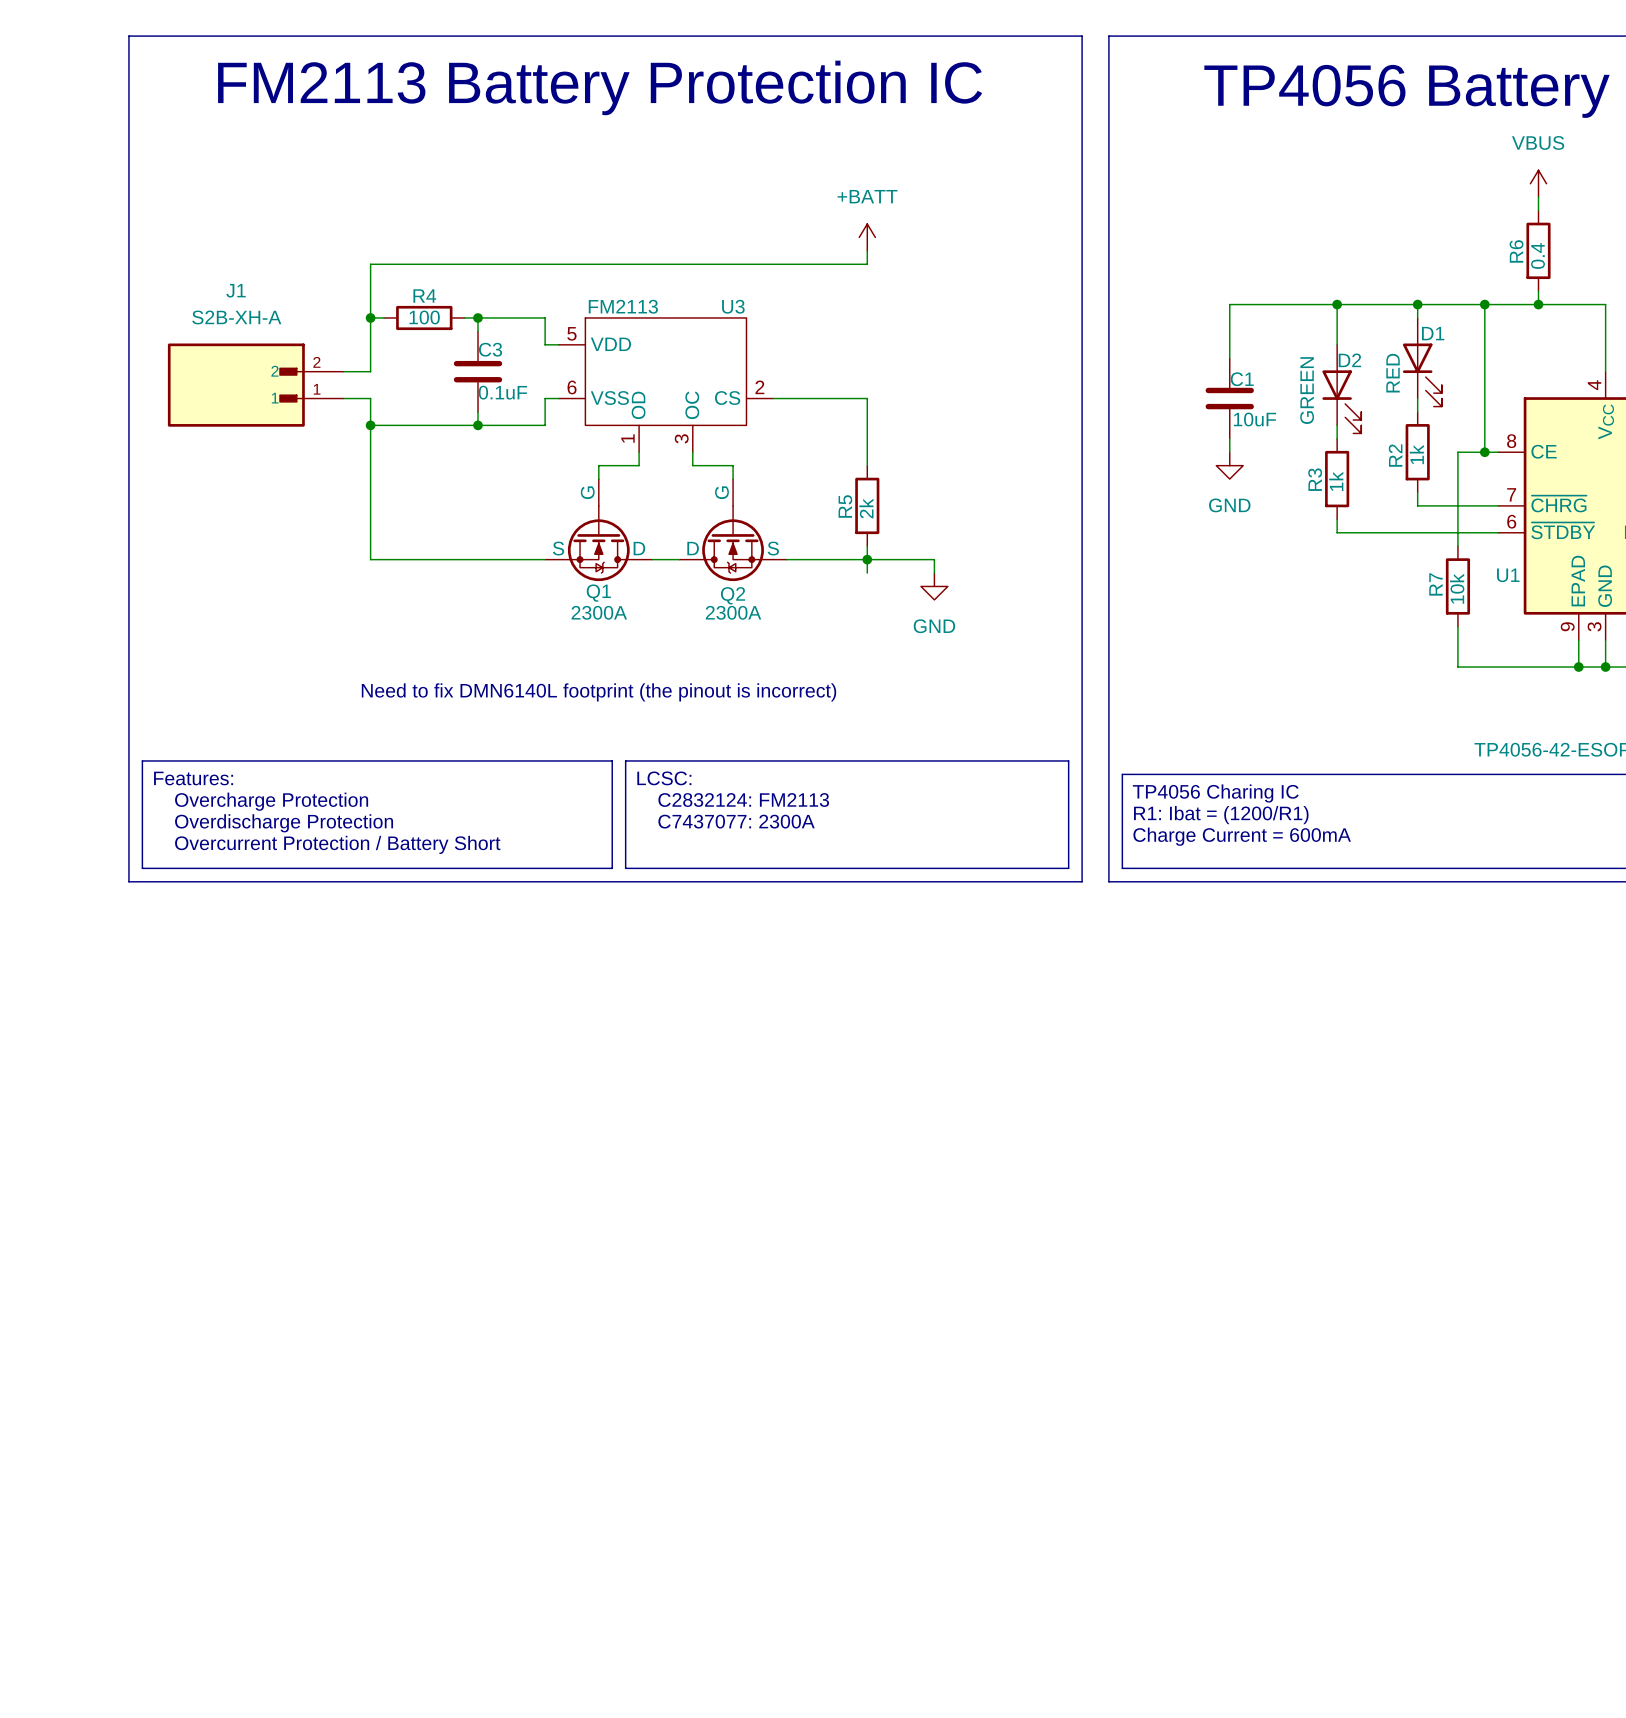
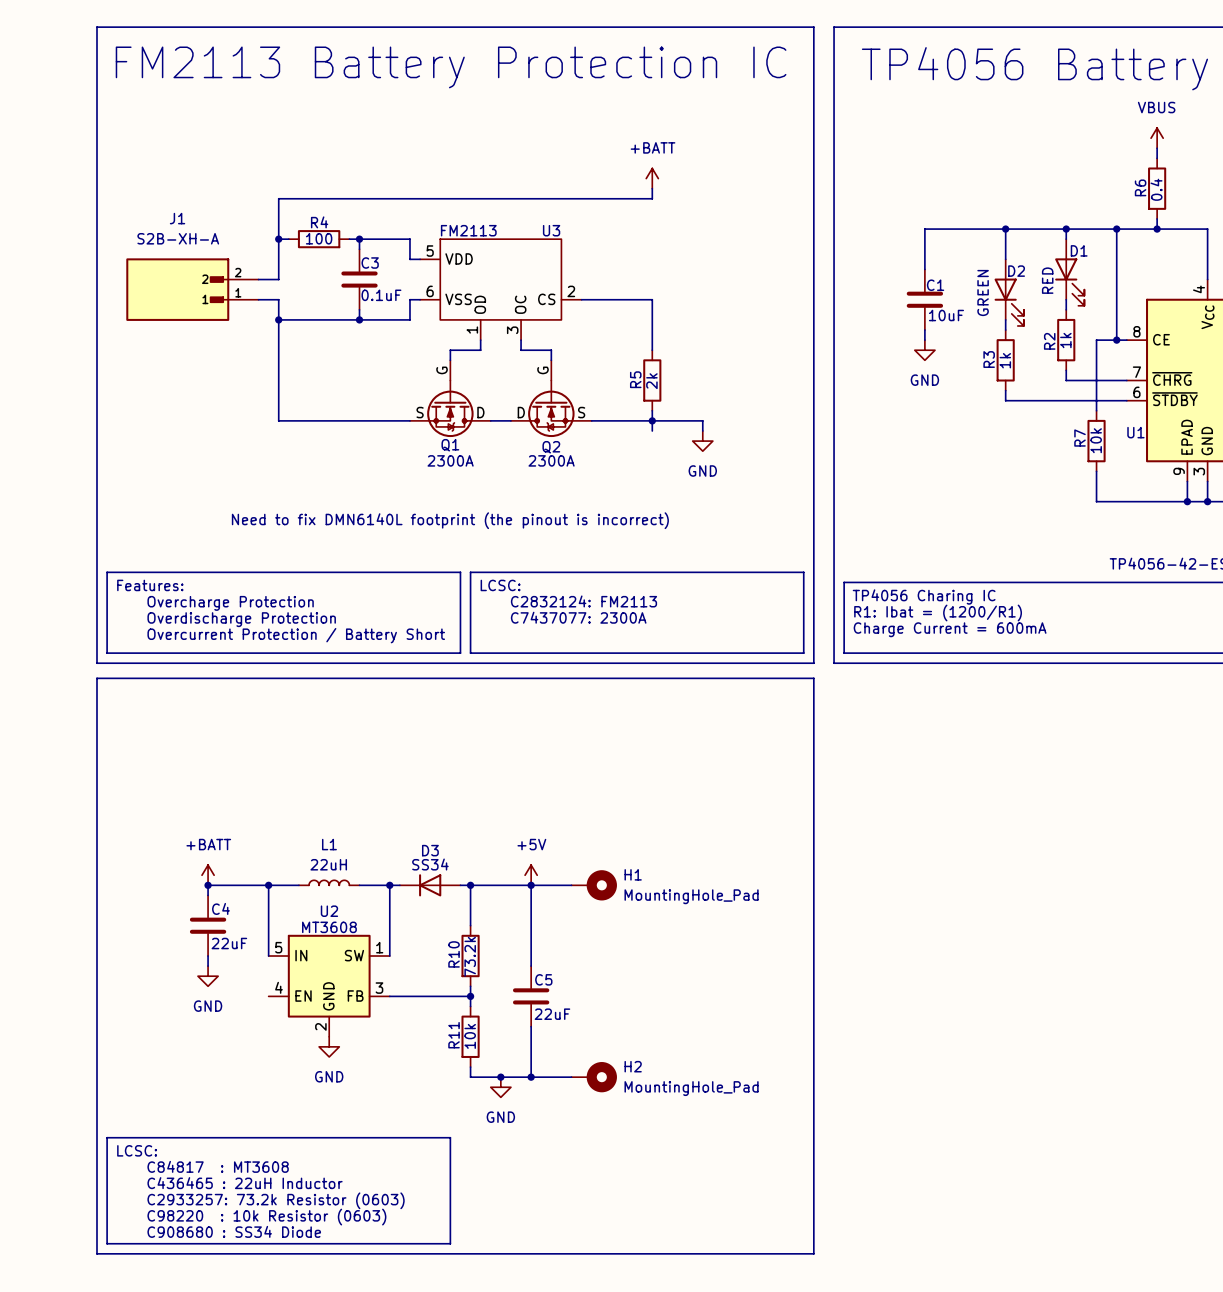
line: none -> (96, 678) (813, 678) (813, 1253) (96, 1253) (96, 678)
power symbol: none -> +BATT (208, 875)
power symbol: none -> +5V (531, 875)
L1: none -> 22uH (329, 882)
junction: none -> (208, 885)
wire: none -> (268, 885) (268, 956)
junction: none -> (268, 885)
wire: none -> (298, 885) (208, 885) (208, 895)
wire: none -> (359, 885) (399, 885)
wire: none -> (389, 885) (389, 956)
junction: none -> (389, 885)
D3: none -> SS34 (430, 885)
wire: none -> (460, 885) (571, 885)
wire: none -> (470, 885) (470, 925)
junction: none -> (470, 885)
wire: none -> (531, 885) (531, 966)
junction: none -> (531, 885)
H1: none -> MountingHole_Pad (594, 885)
C4: none -> 22uF (208, 925)
wire: none -> (208, 956) (208, 966)
R10: none -> 73.2k (470, 956)
power symbol: none -> GND (208, 976)
U2: none -> MT3608 (329, 985)
wire: none -> (470, 986) (470, 1006)
wire: none -> (389, 996) (470, 996)
junction: none -> (470, 996)
C5: none -> 22uF (531, 996)
wire: none -> (531, 1026) (531, 1077)
R11: none -> 10k (470, 1036)
power symbol: none -> GND (329, 1046)
wire: none -> (470, 1067) (470, 1077) (571, 1077)
junction: none -> (500, 1077)
junction: none -> (531, 1077)
H2: none -> MountingHole_Pad (594, 1077)
power symbol: none -> GND (500, 1087)
line: none -> (107, 1137) (450, 1137) (450, 1243) (107, 1243) (107, 1137)
text: none -> LCSC: (137, 1150)
text: none -> C84817 : MT3608 (218, 1166)
text: none -> C436465 : 22uH Inductor (245, 1183)
text: none -> C2933257: 73.2k Resistor (0603) (276, 1200)
text: none -> C98220 : 10k Resistor (0603) (266, 1217)
text: none -> C908680 : SS34 Diode (234, 1231)

